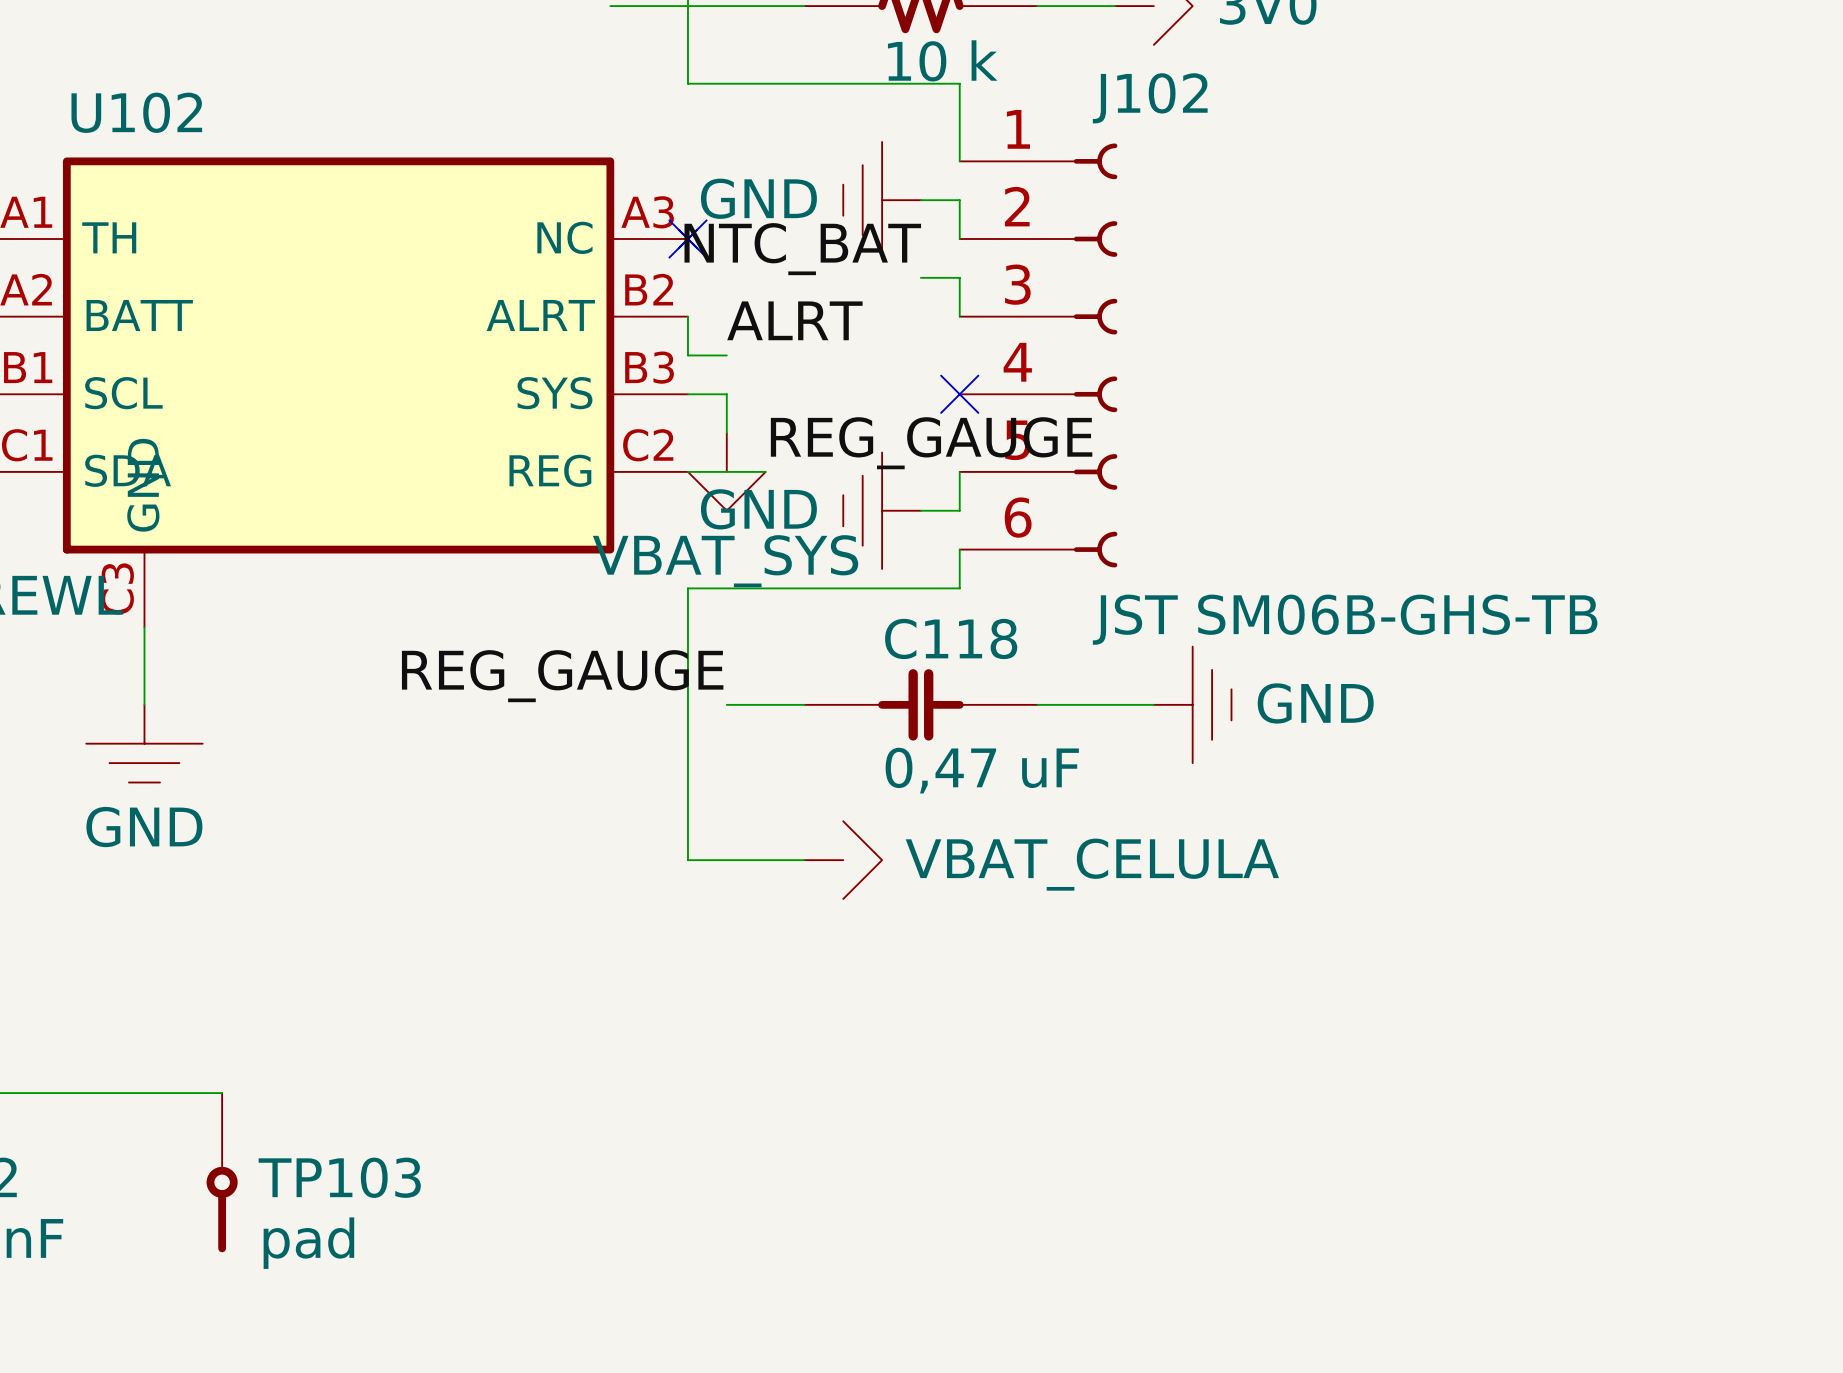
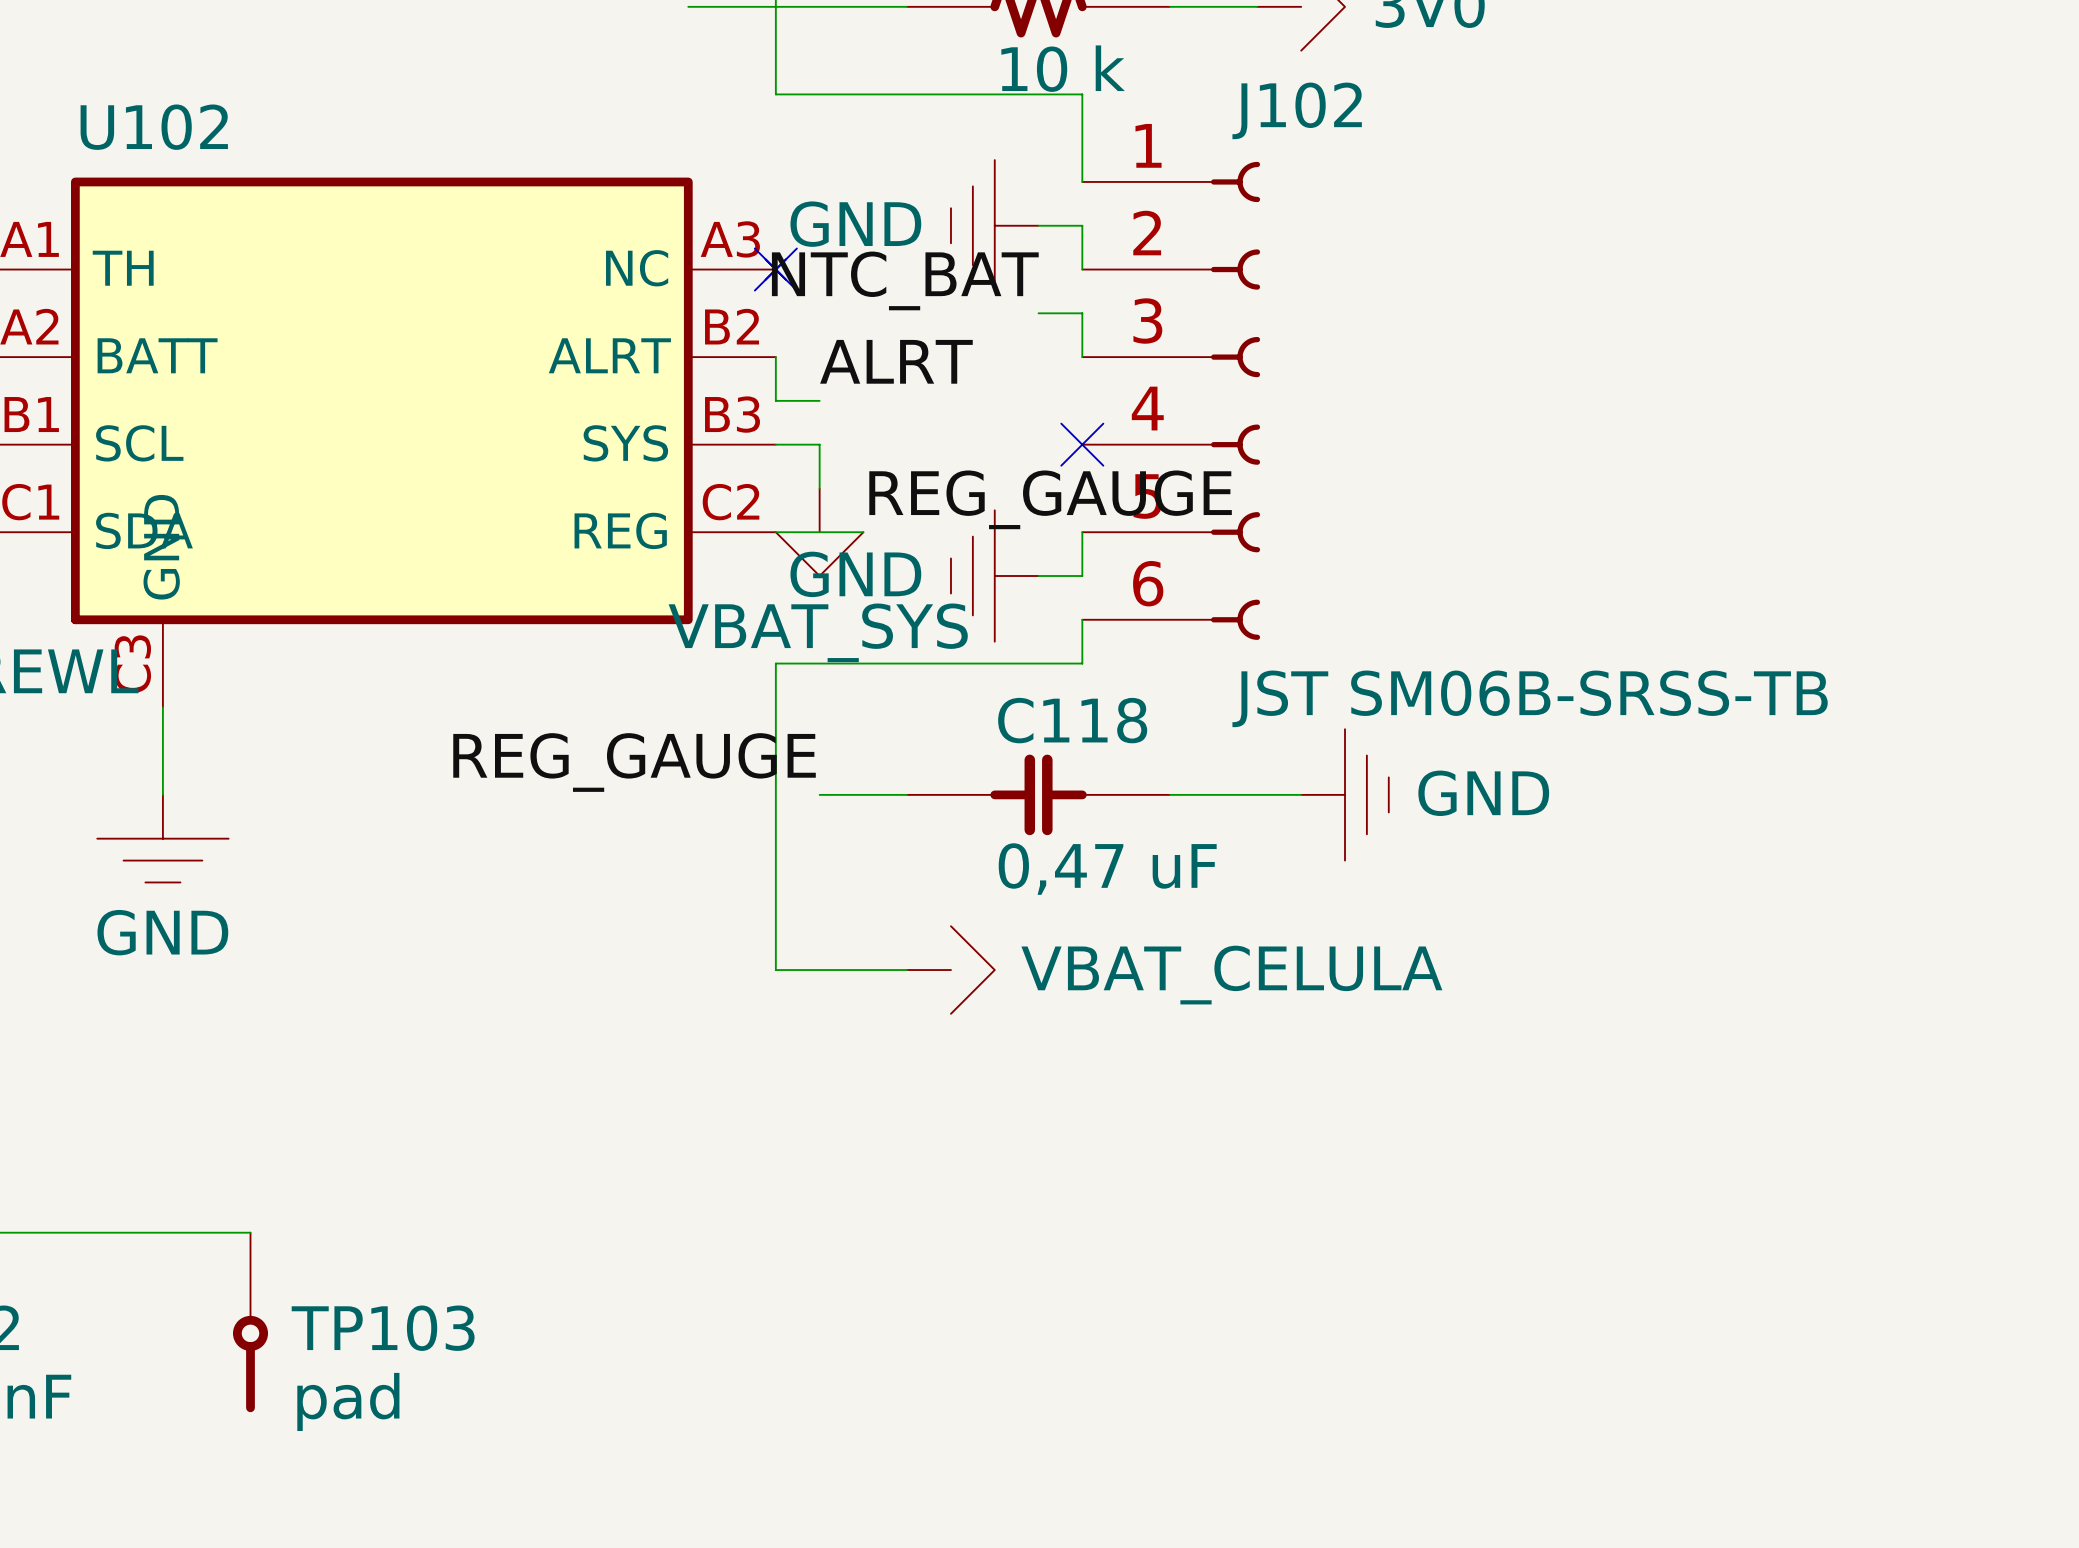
J102 value: JST SM06B-GHS-TB (1345, 619) -> JST SM06B-SRSS-TB (1530, 698)

